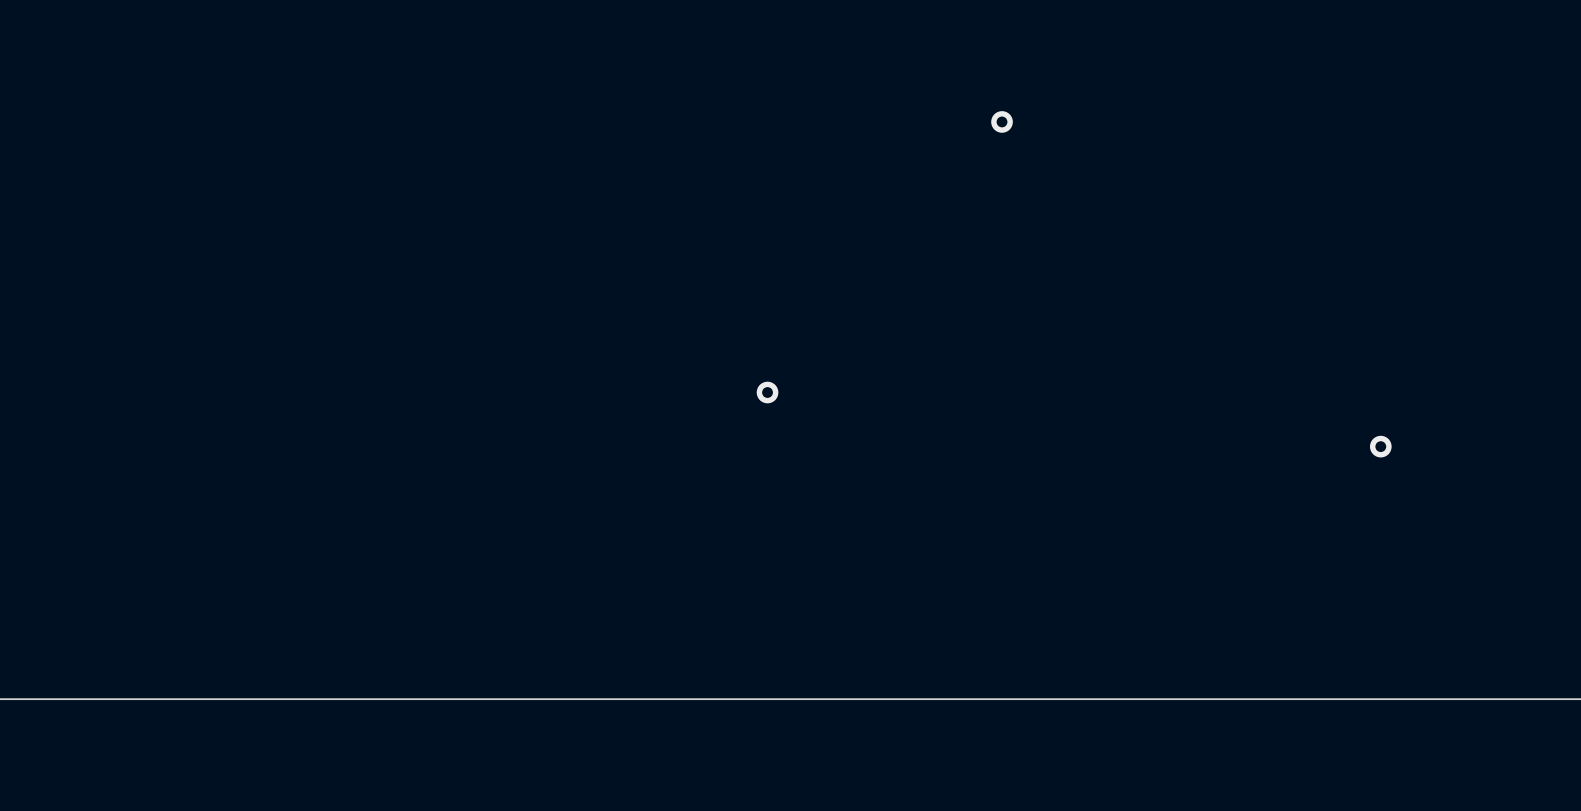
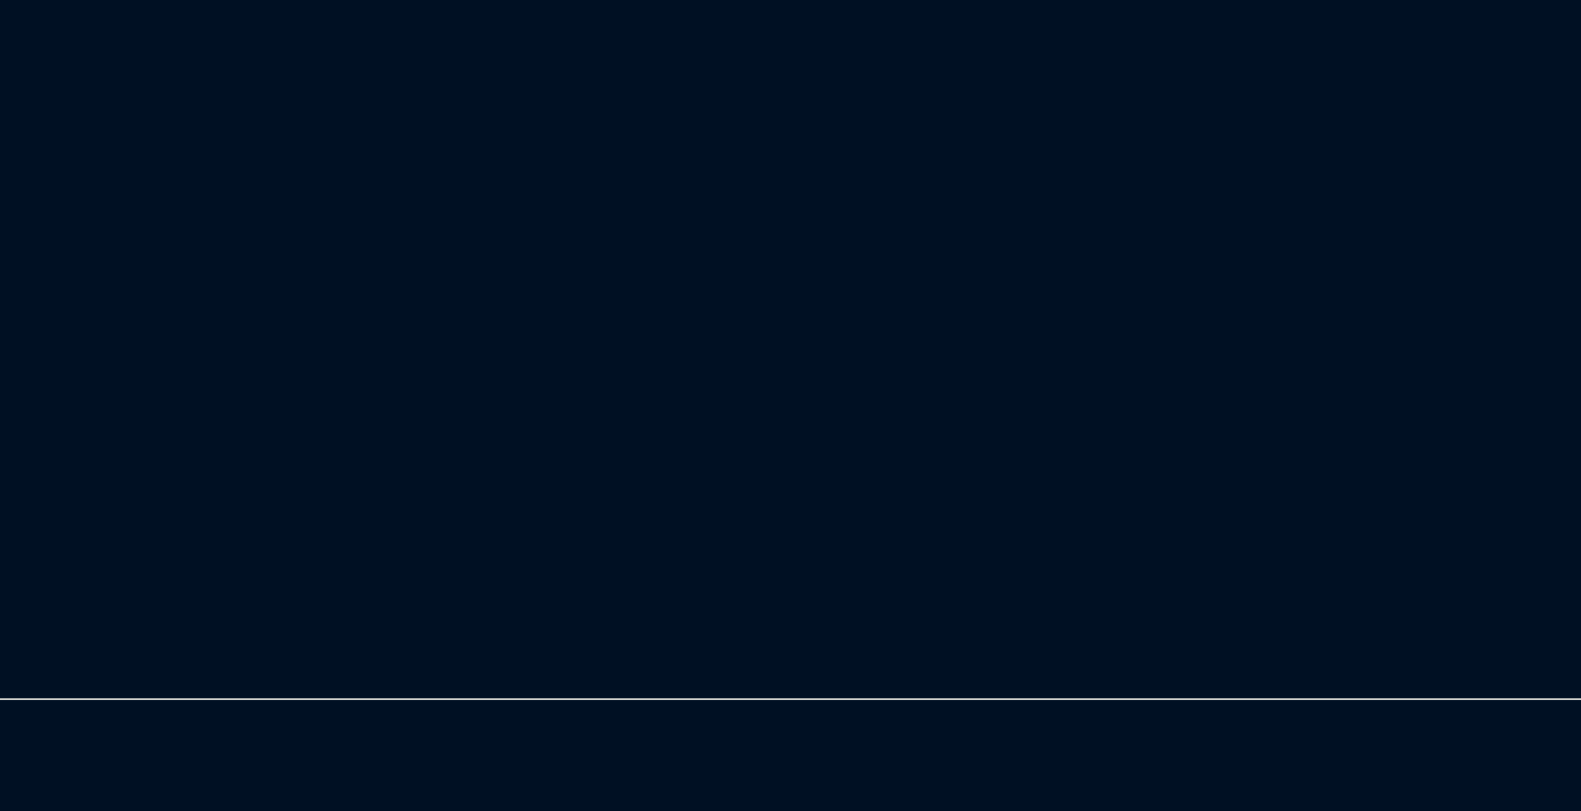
via: (1002, 121) -> none
via: (767, 392) -> none
via: (1380, 446) -> none

